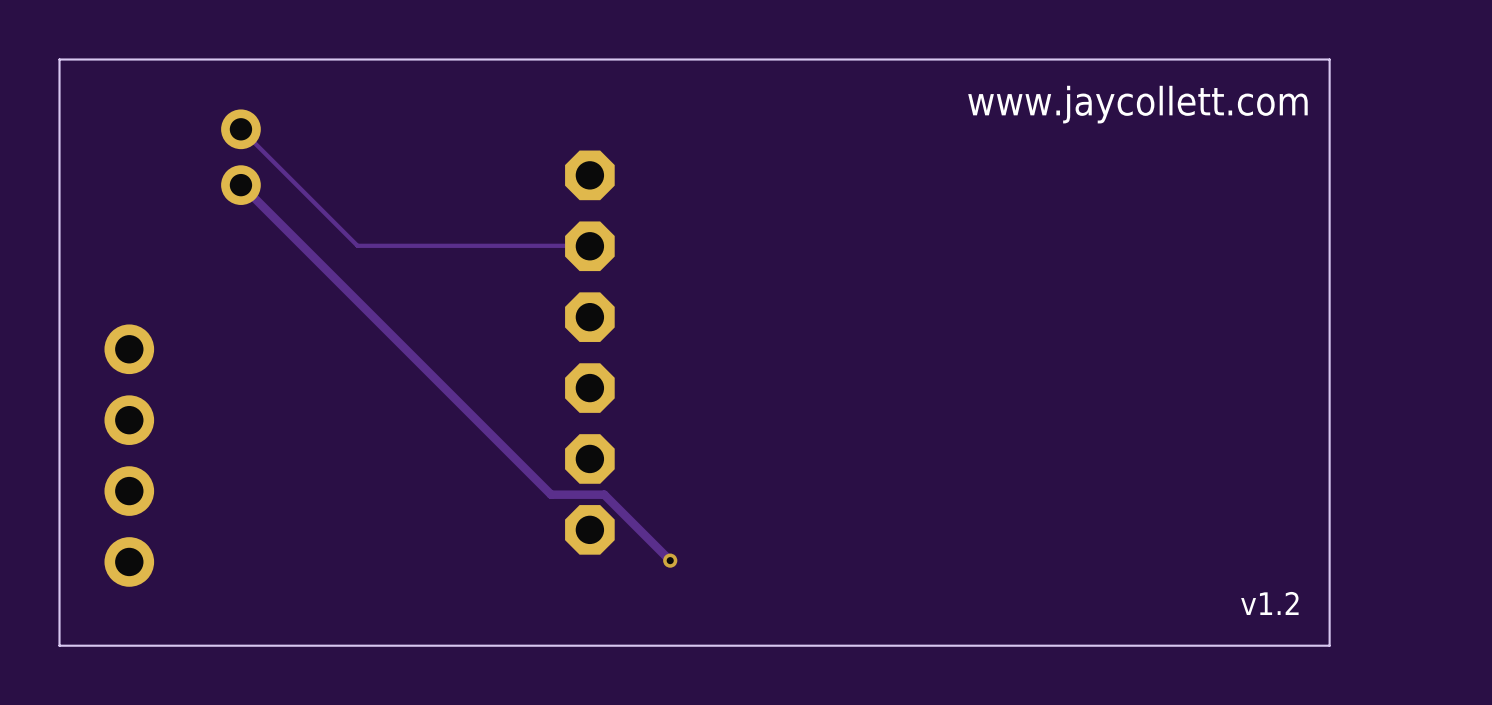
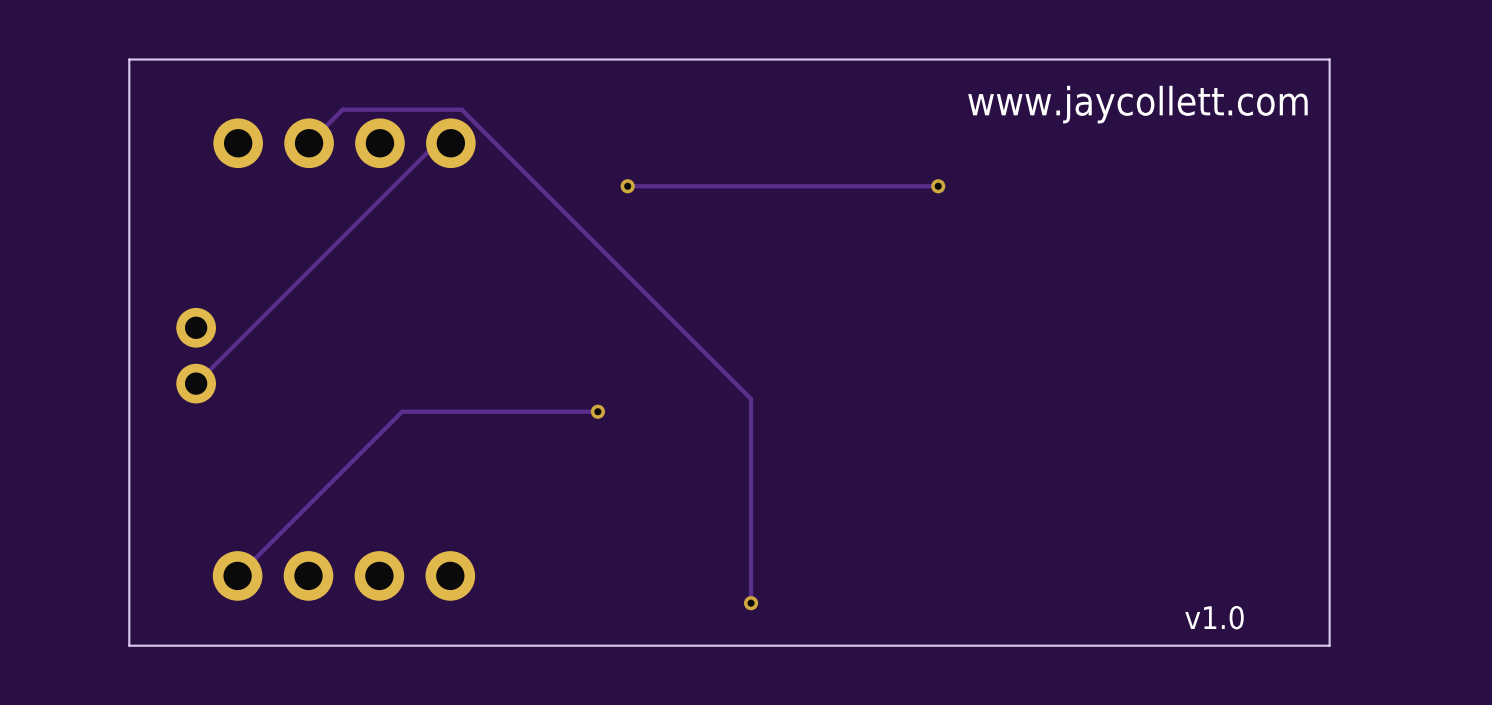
board edge: (129, 59) (59, 59) (59, 645) (129, 645) -> (129, 59) (129, 645)
track: (240, 129) (357, 245) (589, 246) -> none
track: none -> (309, 143) (342, 109) (461, 109) (751, 398) (751, 603)
part: none -> (344, 143)
track: none -> (450, 143) (436, 143) (196, 383)
part position: (240, 157) -> (196, 355)
track: (240, 185) (551, 494) (604, 494) (670, 560) -> none
via: none -> (627, 186)
track: none -> (938, 186) (627, 186)
via: none -> (938, 186)
part: (589, 352) -> none
track: none -> (597, 411) (402, 411) (237, 575)
via: none -> (597, 411)
part: (129, 455) -> none
via: (670, 560) -> none
part: none -> (343, 575)
via: none -> (751, 603)
text: v1.2 (1269, 603) -> v1.0 (1214, 617)

